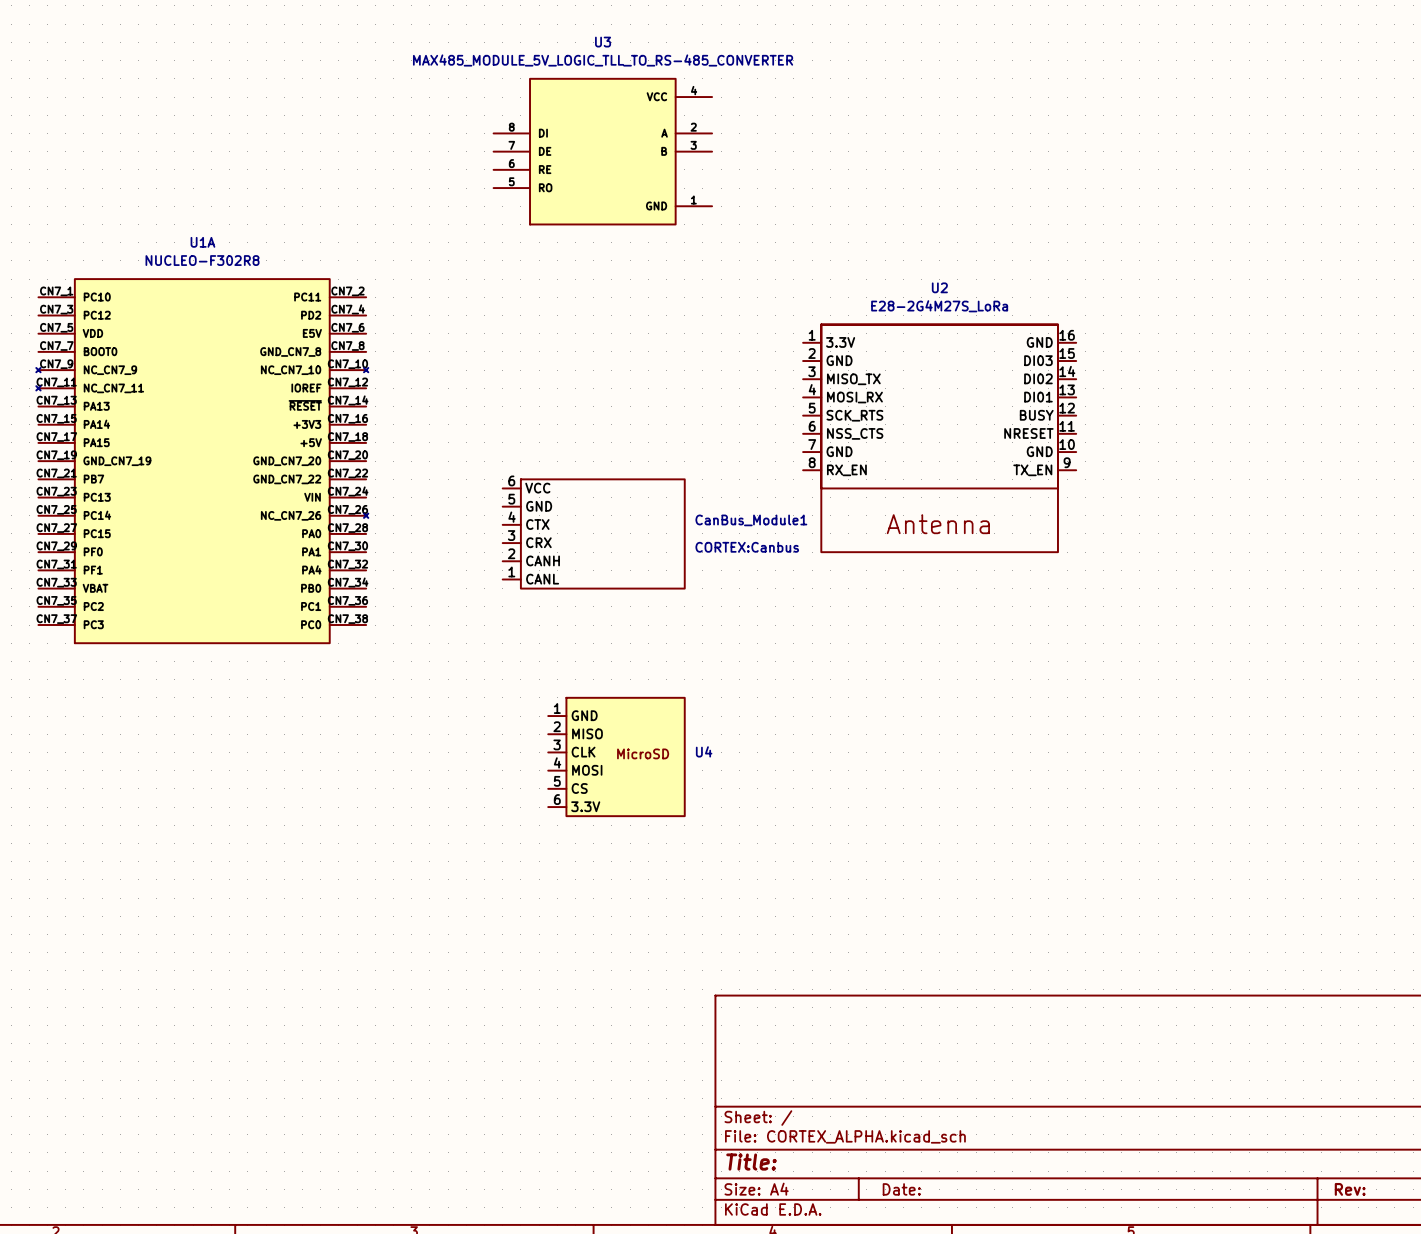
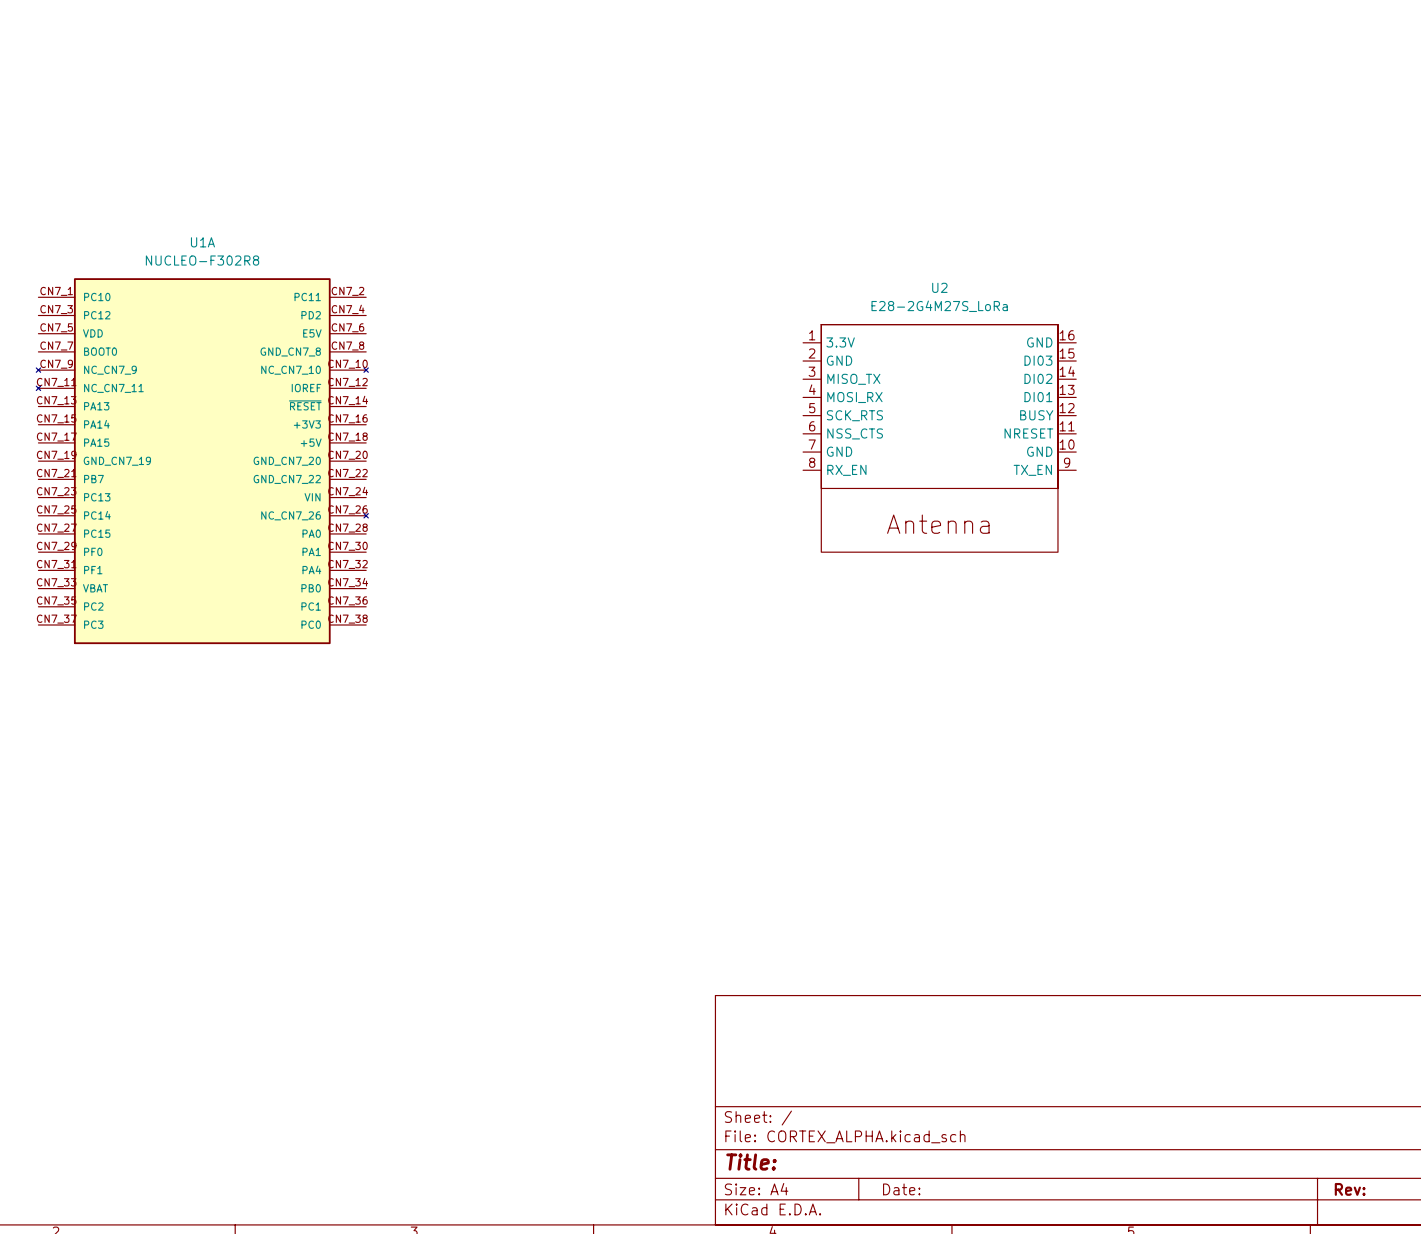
U3: MAX485_MODULE_5V_LOGIC_TLL_TO_RS-485_CONVERTER (602, 151) -> none
CanBus_Module1: (593, 533) -> none
U4: (616, 756) -> none

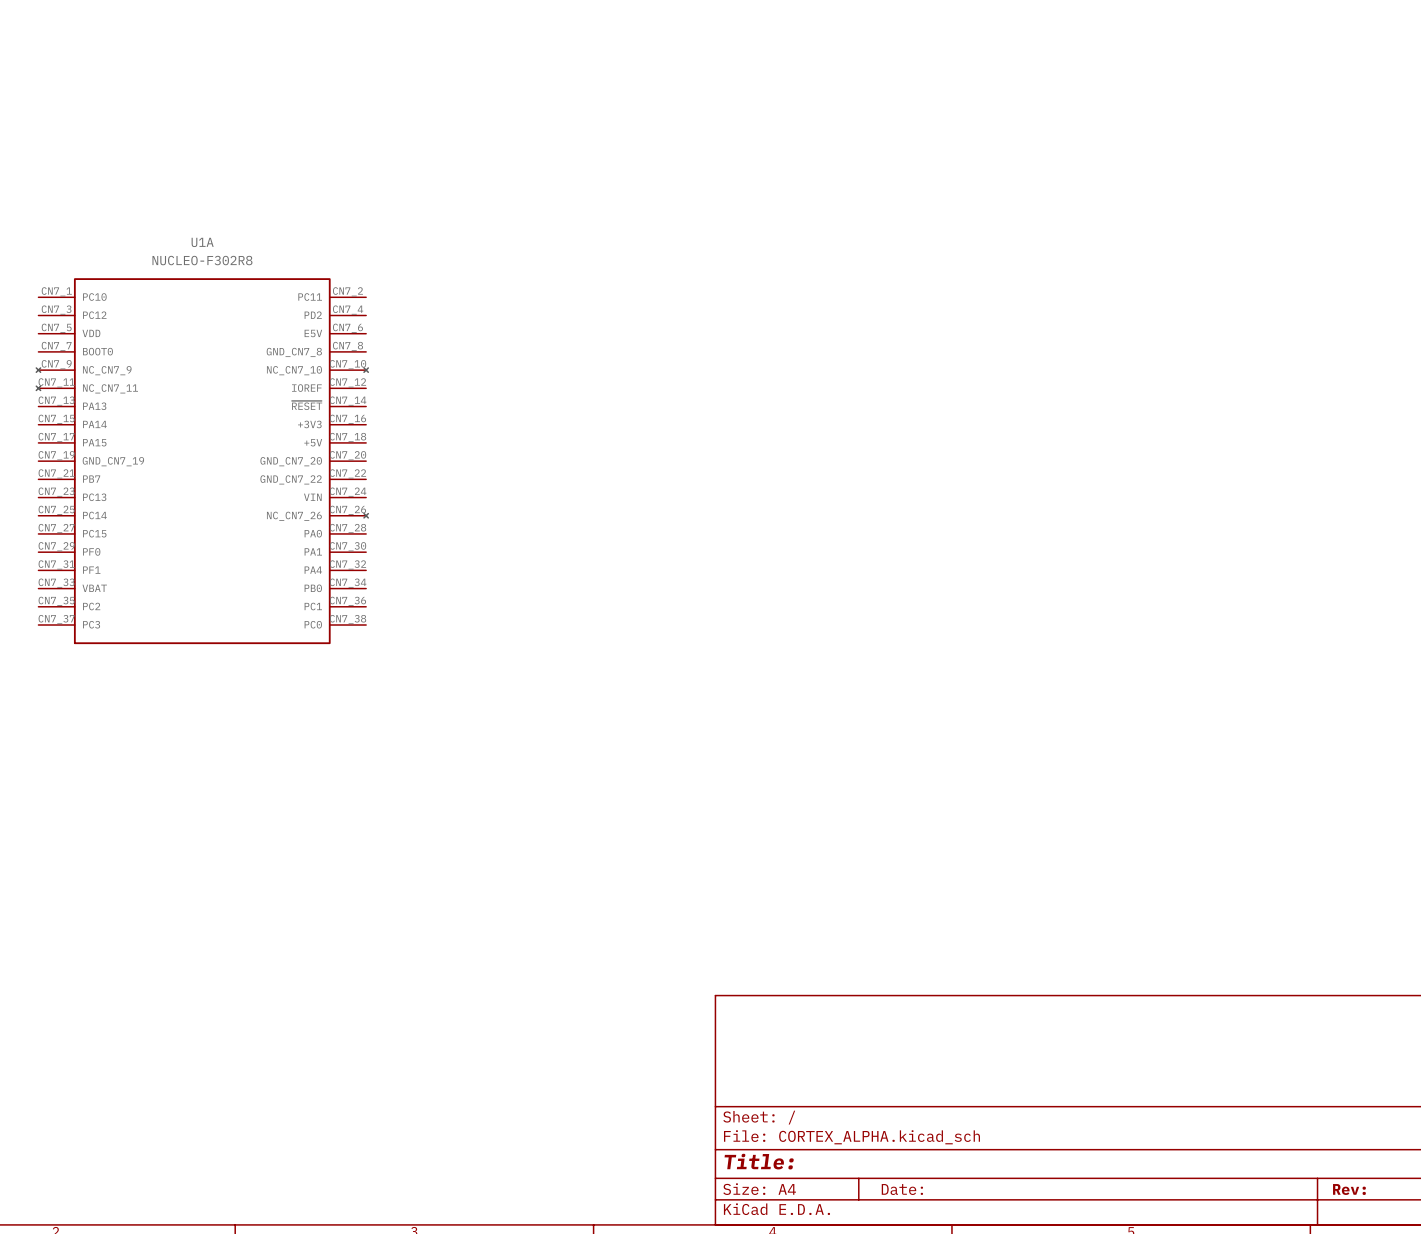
U2: E28-2G4M27S_LoRa (939, 438) -> none

